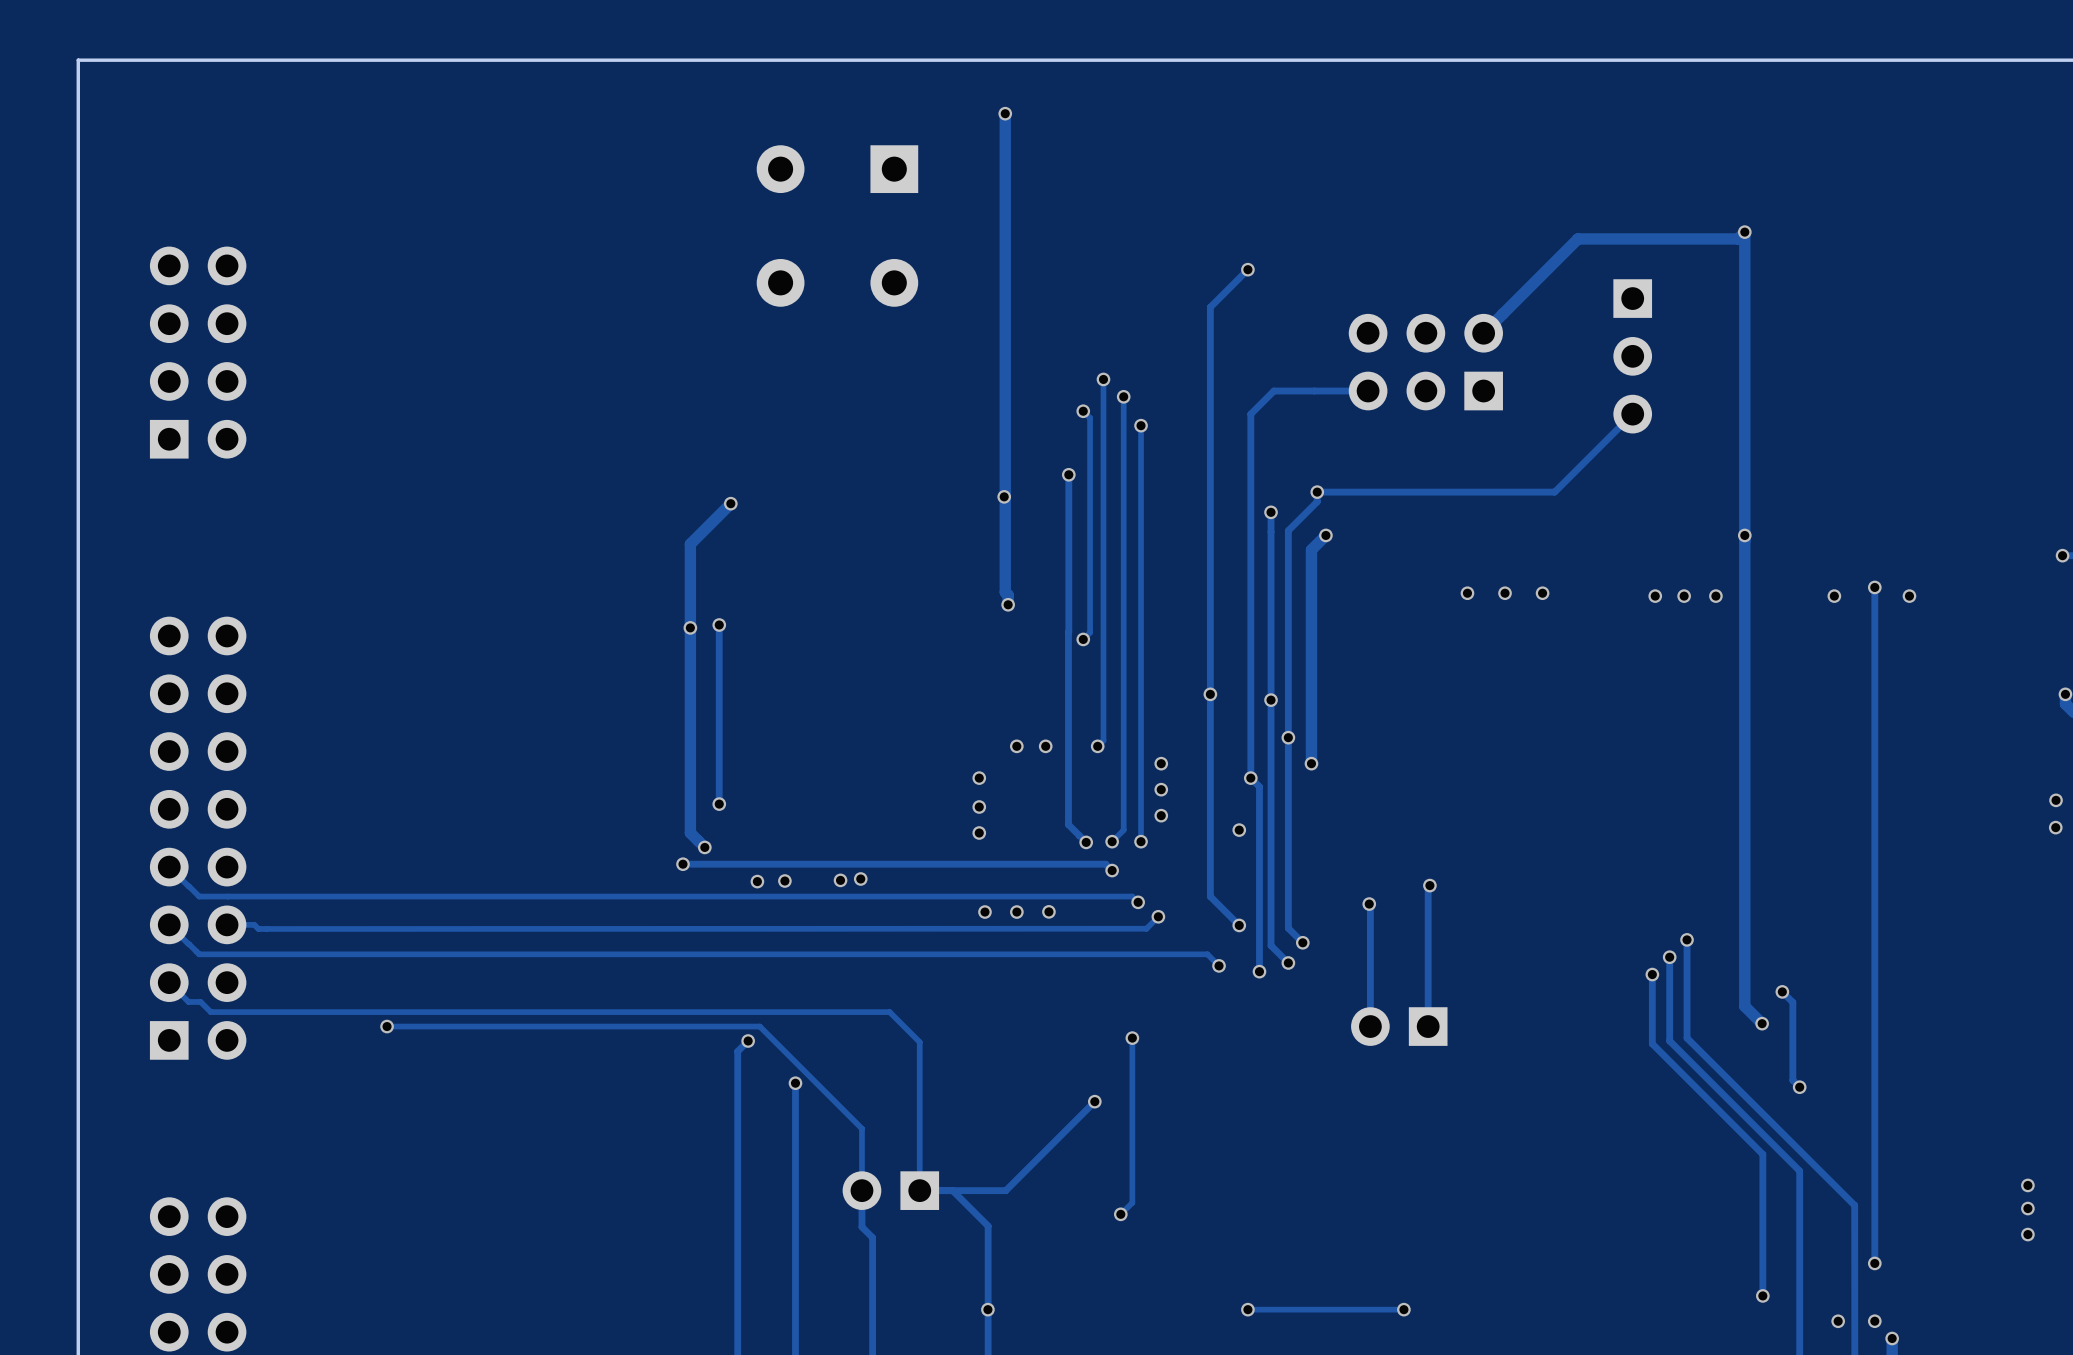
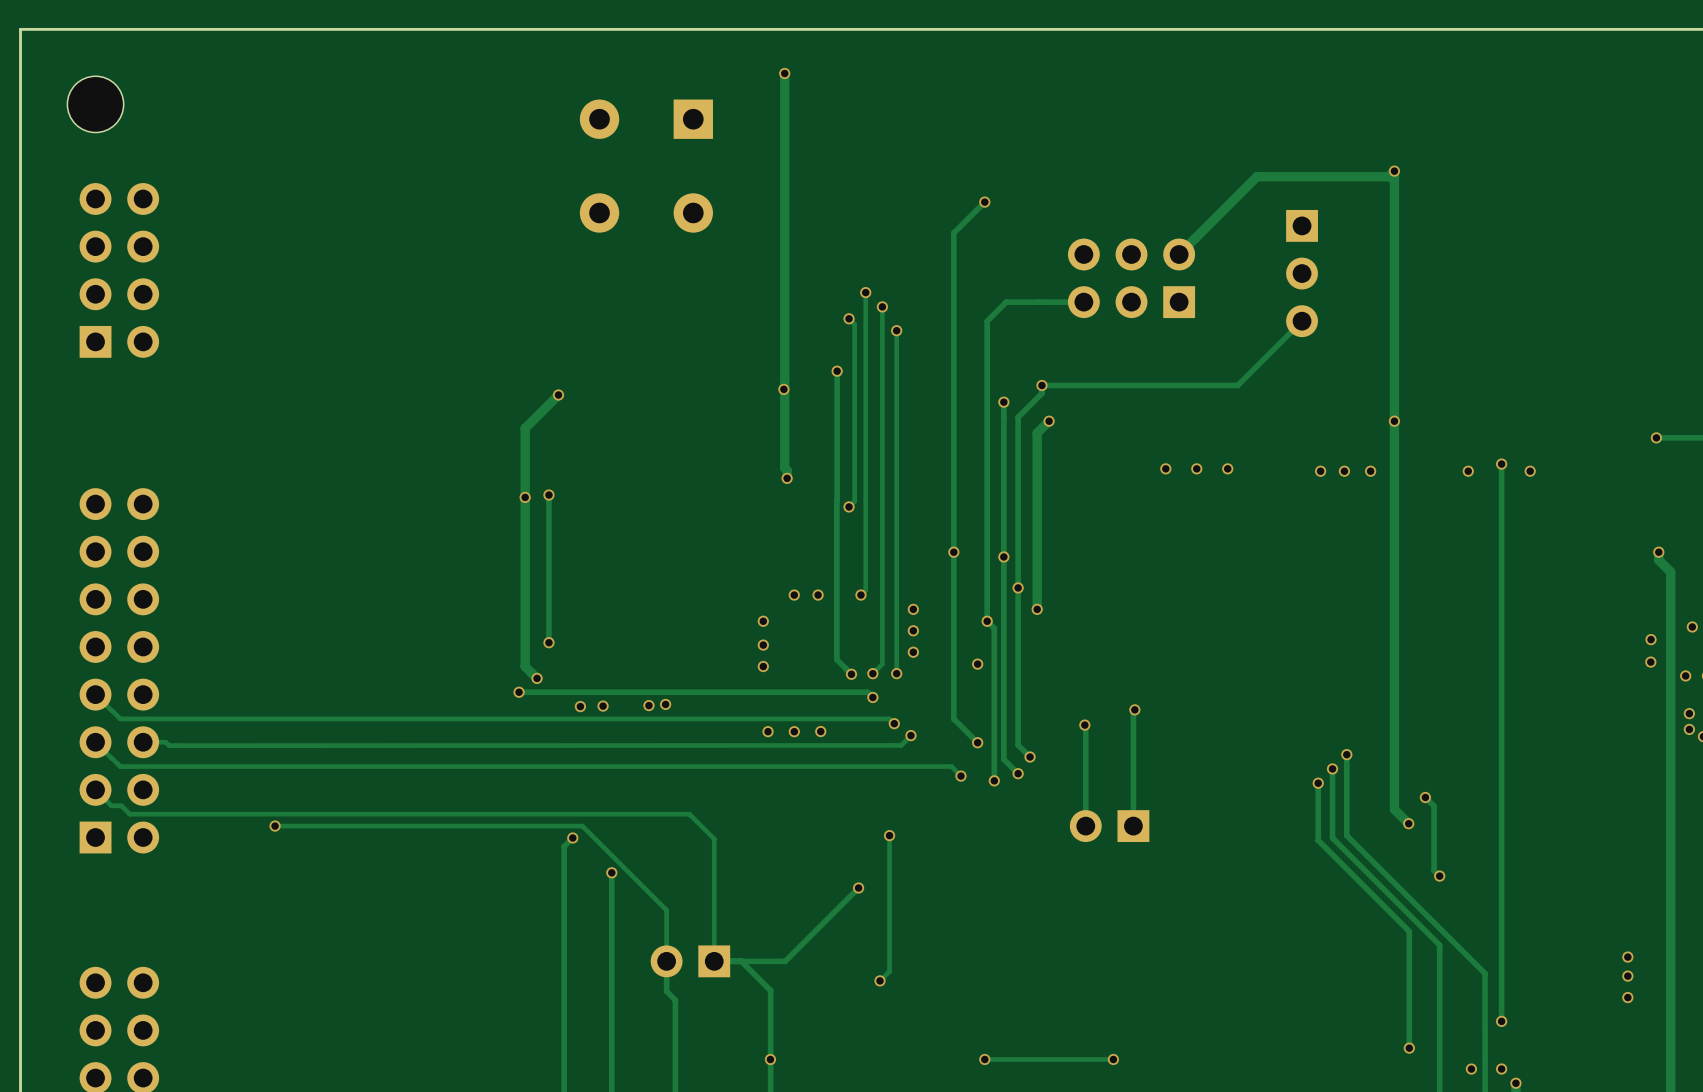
part: none -> (95, 104)

